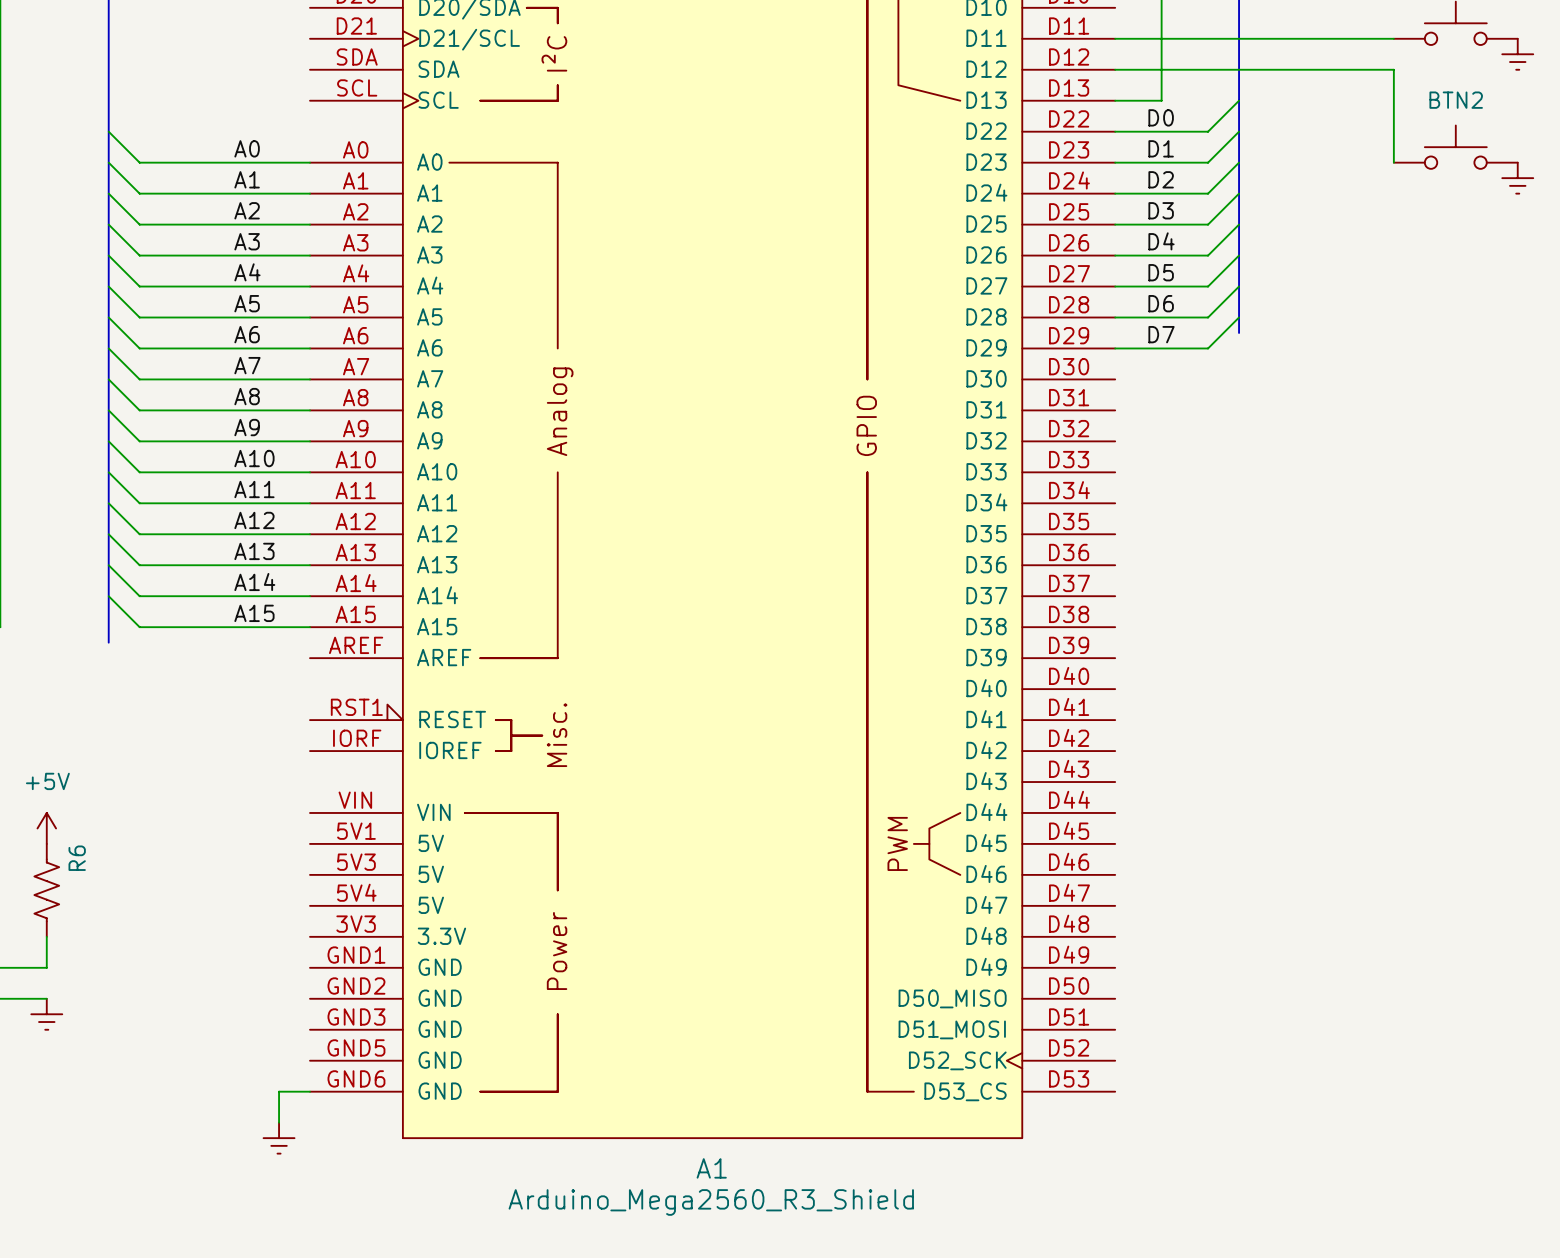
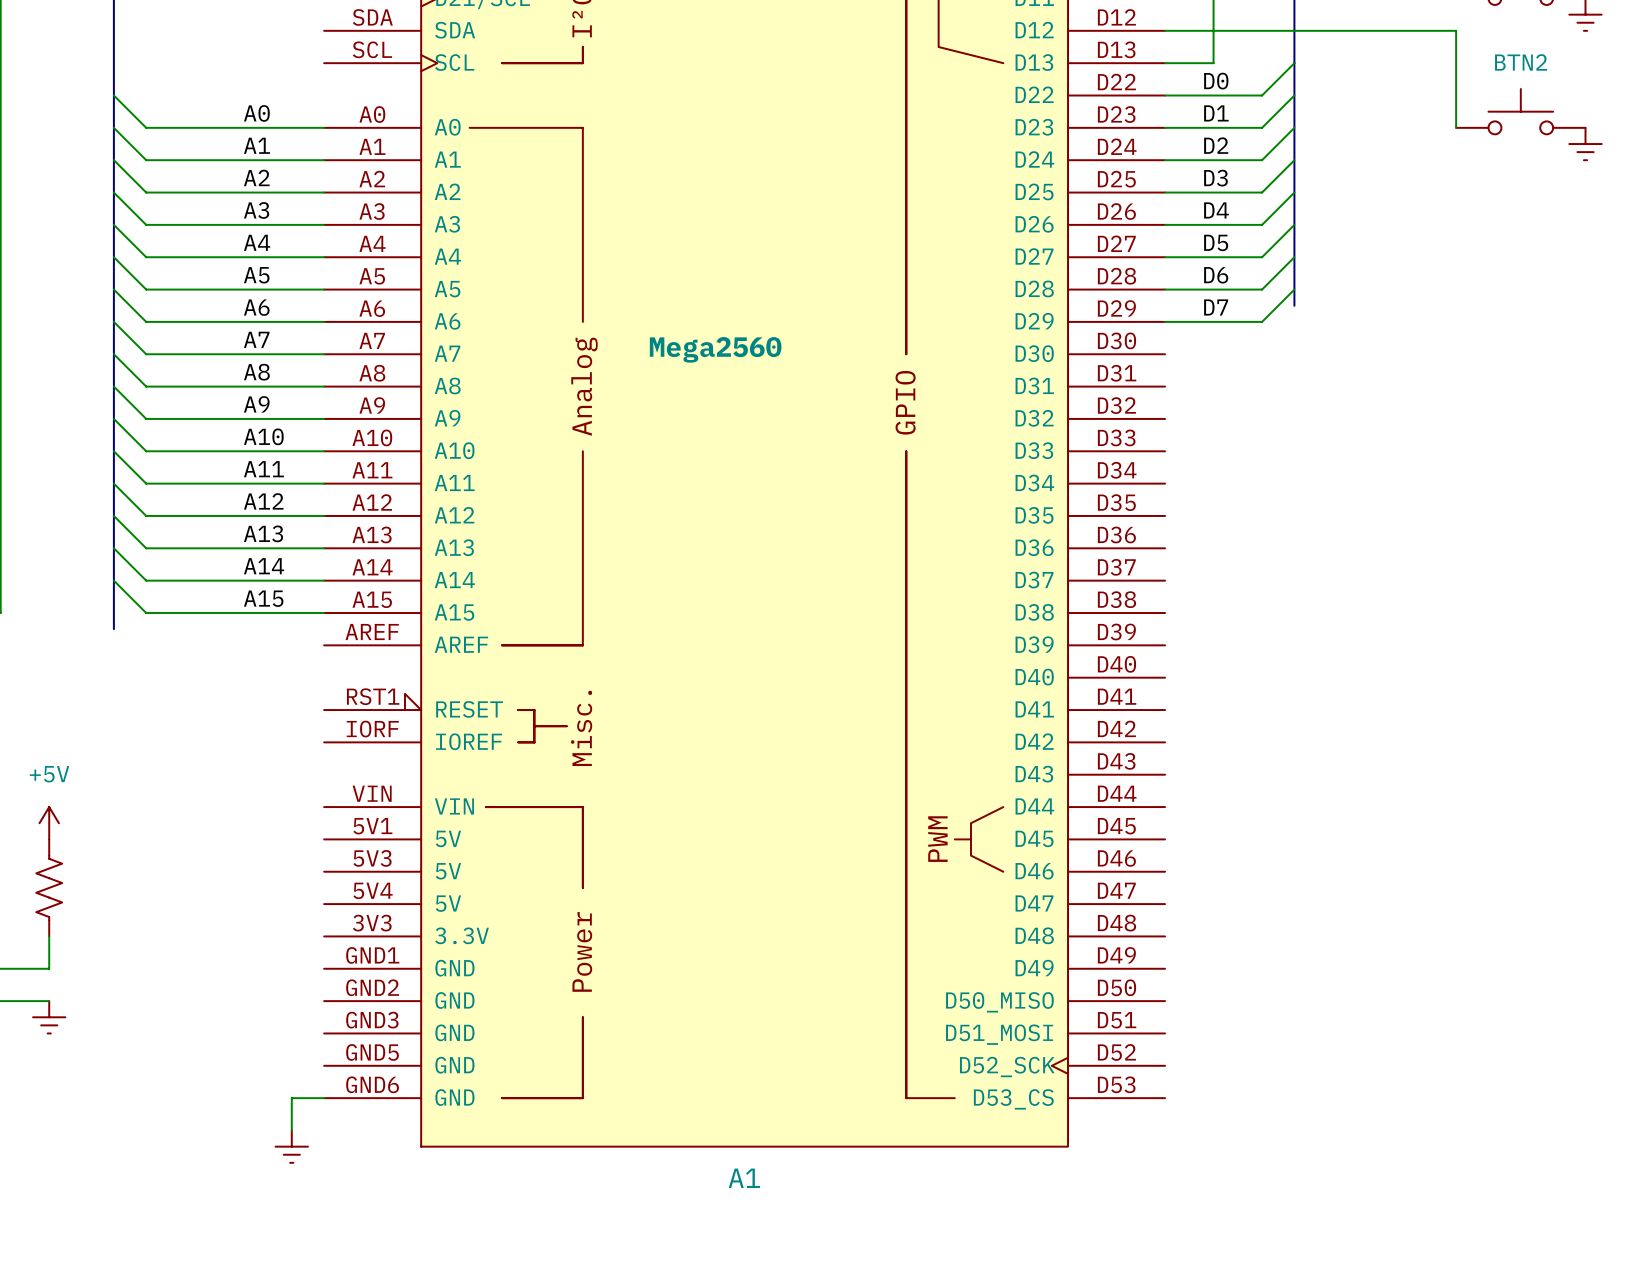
R6 name: R6 (77, 858) -> none
A1 value: Arduino_Mega2560_R3_Shield (711, 1202) -> Mega2560 (715, 349)

